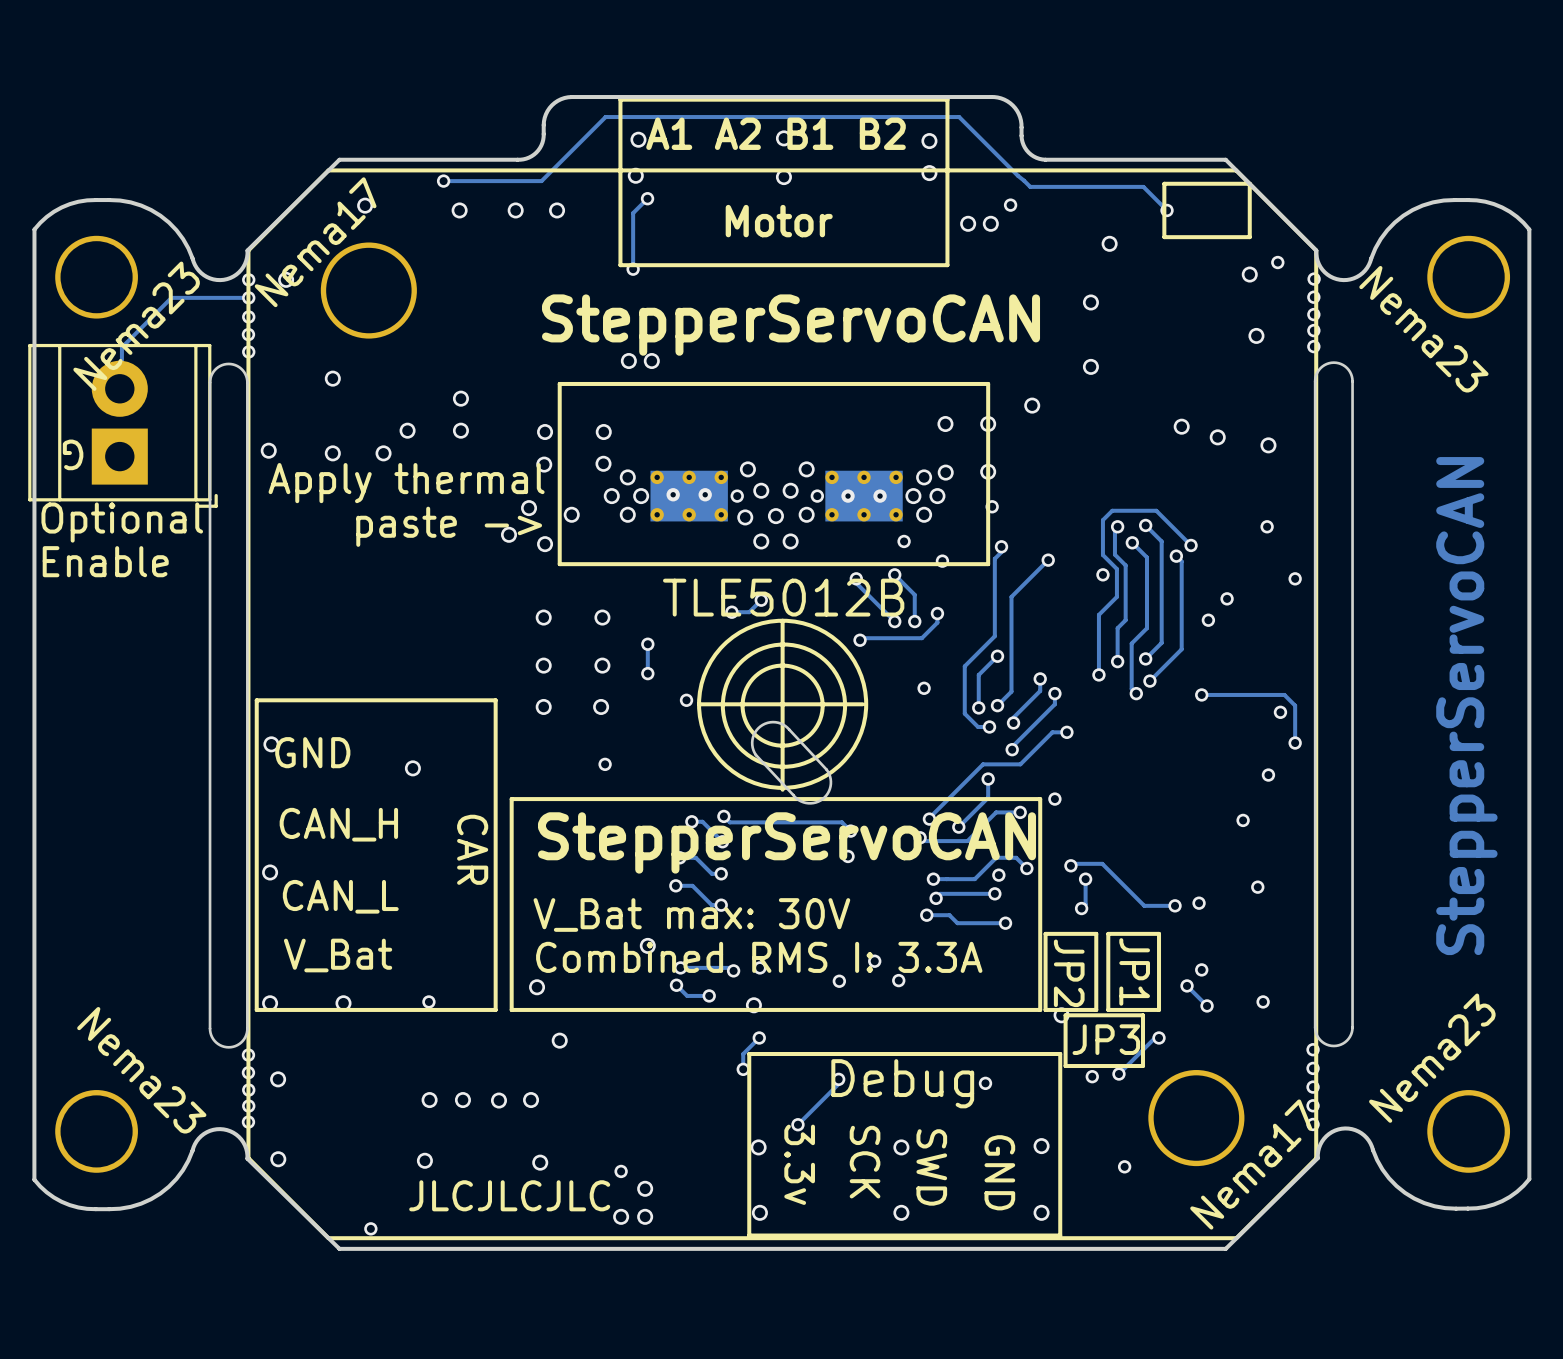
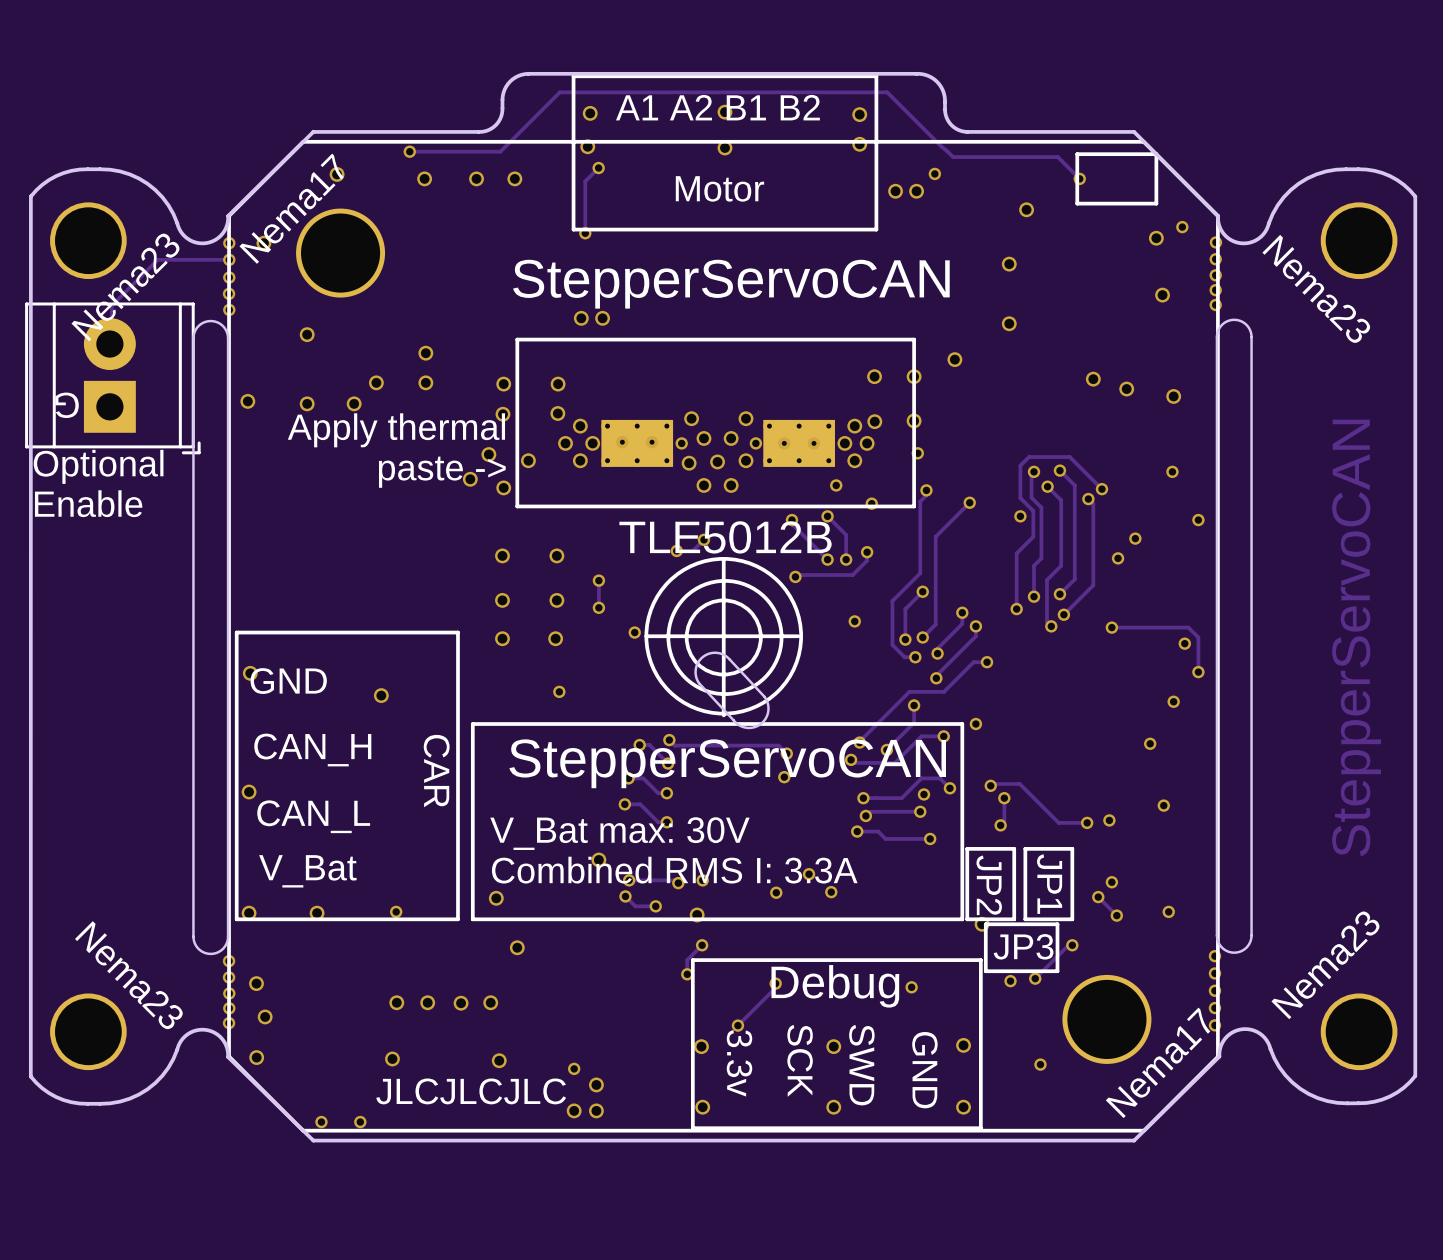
via: none -> (265, 1016)
via: none -> (321, 1122)
via: (370, 1228) -> none
via: none -> (360, 1122)

